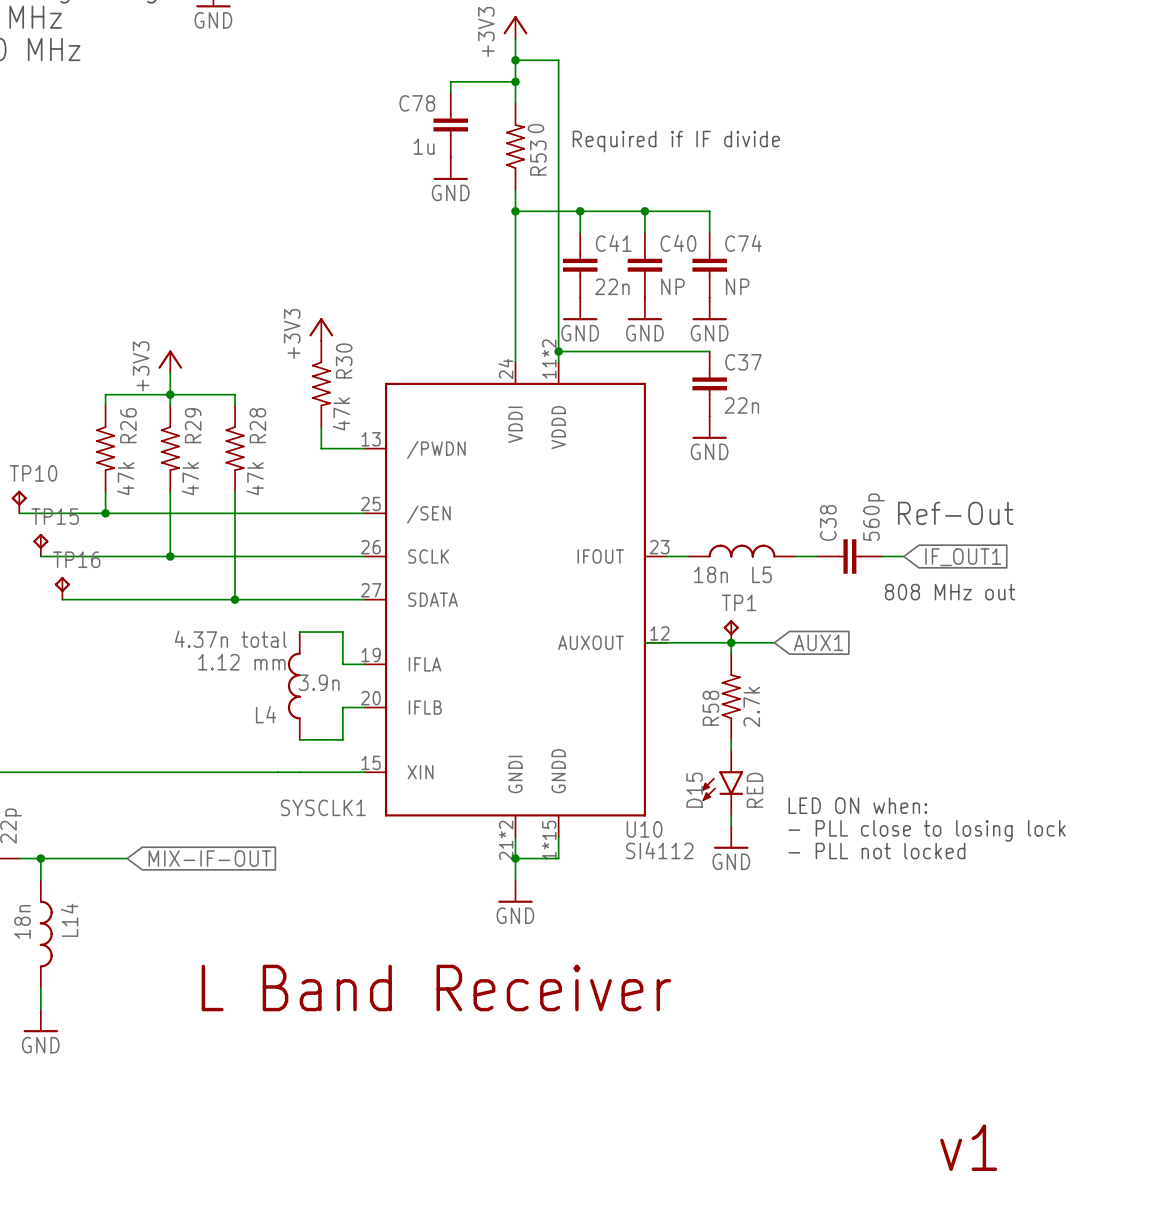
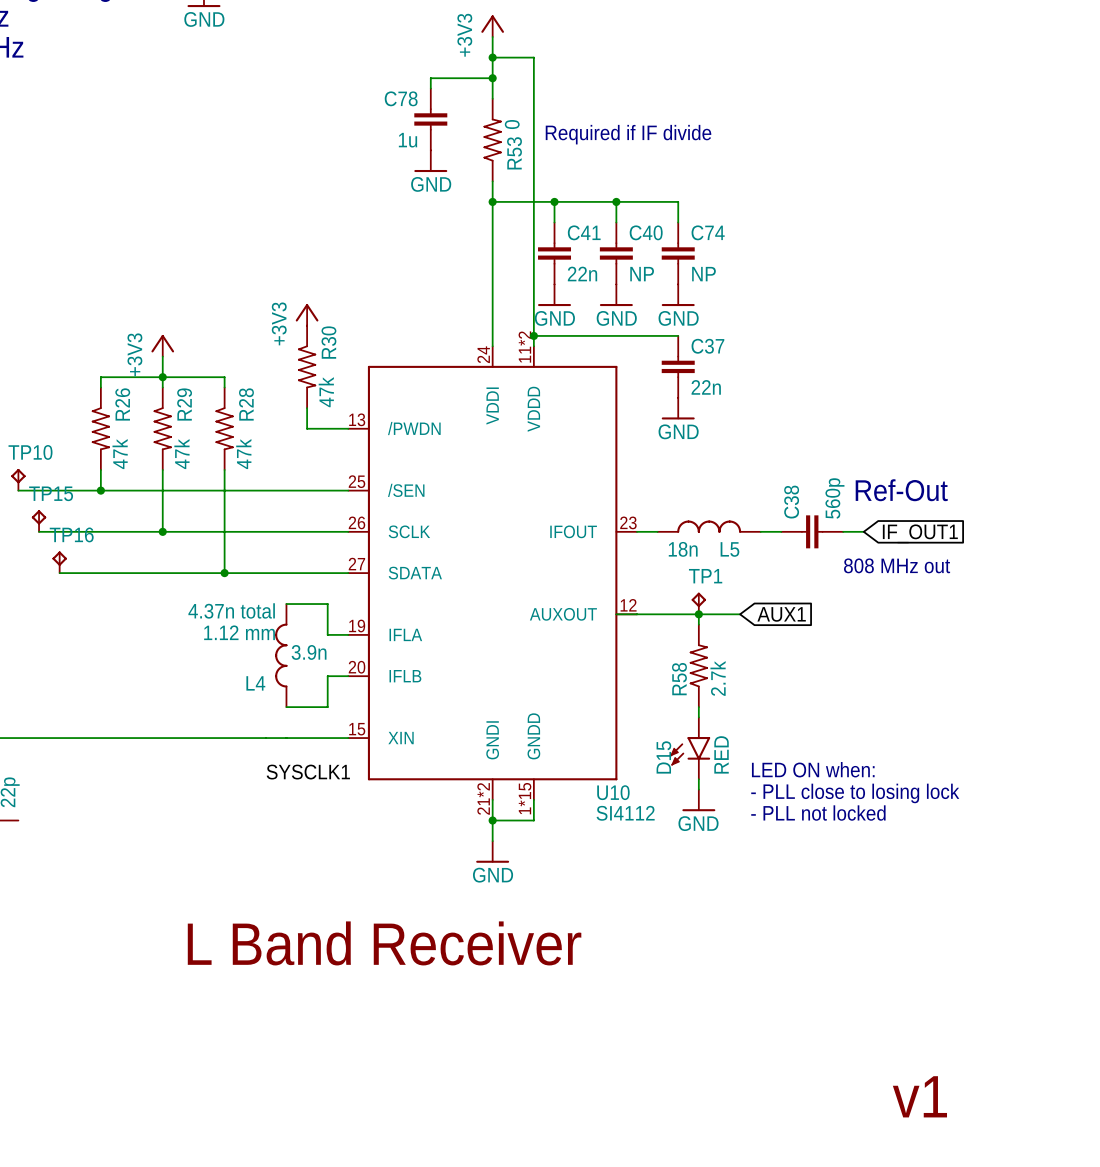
wire: (19, 858) (127, 858) -> none
wire: (40, 858) (40, 880) -> none
junction: (40, 858) -> none
global label: MIX-IF-OUT (209, 858) -> none
L14: 18n (46, 934) -> none
wire: (40, 988) (40, 1009) -> none
power symbol: GND (40, 1020) -> none

